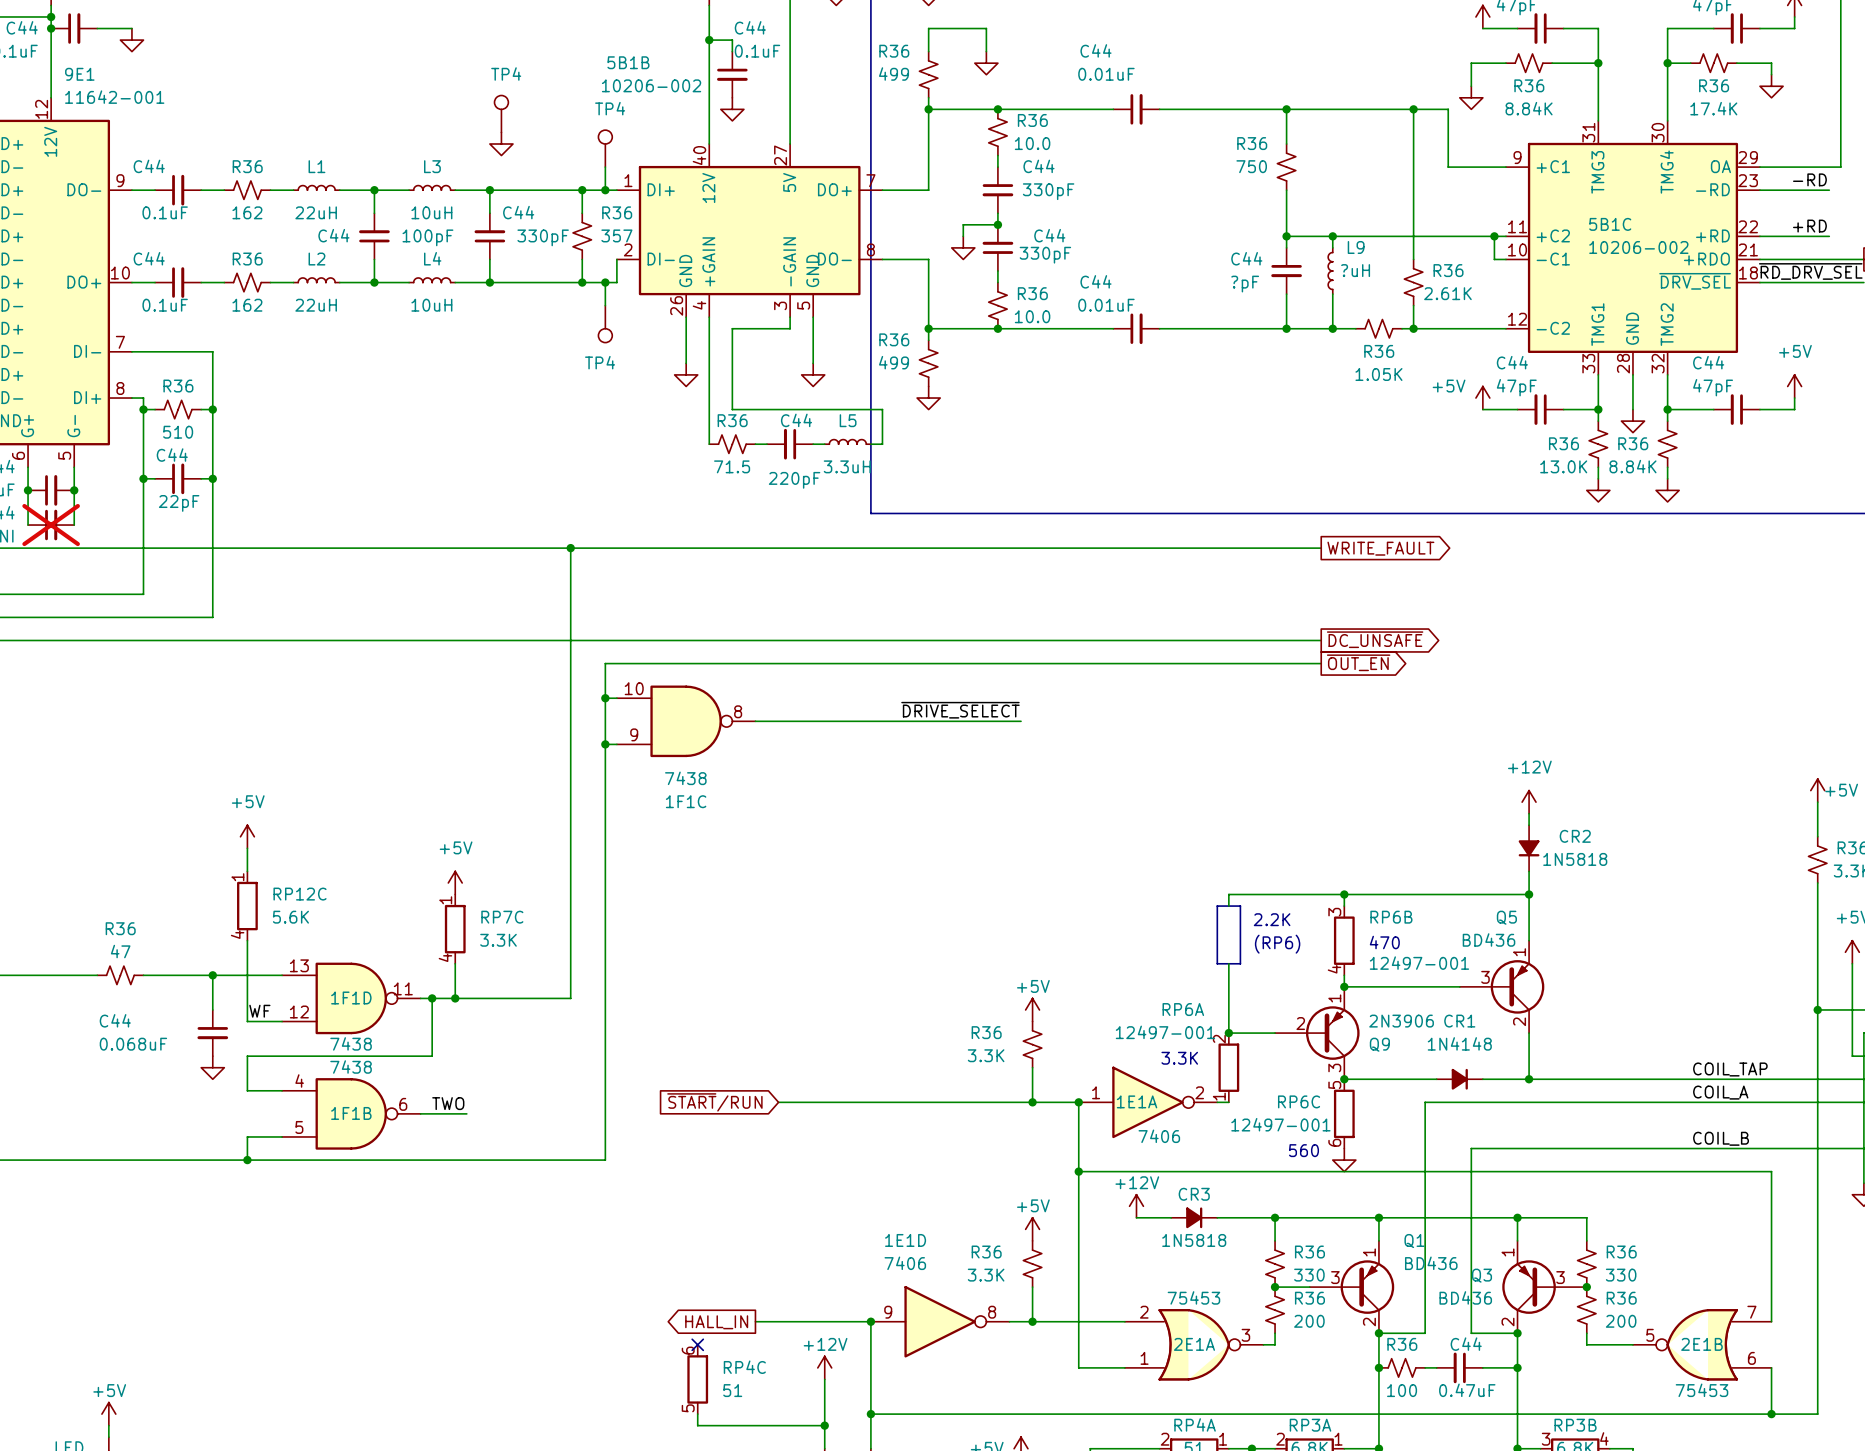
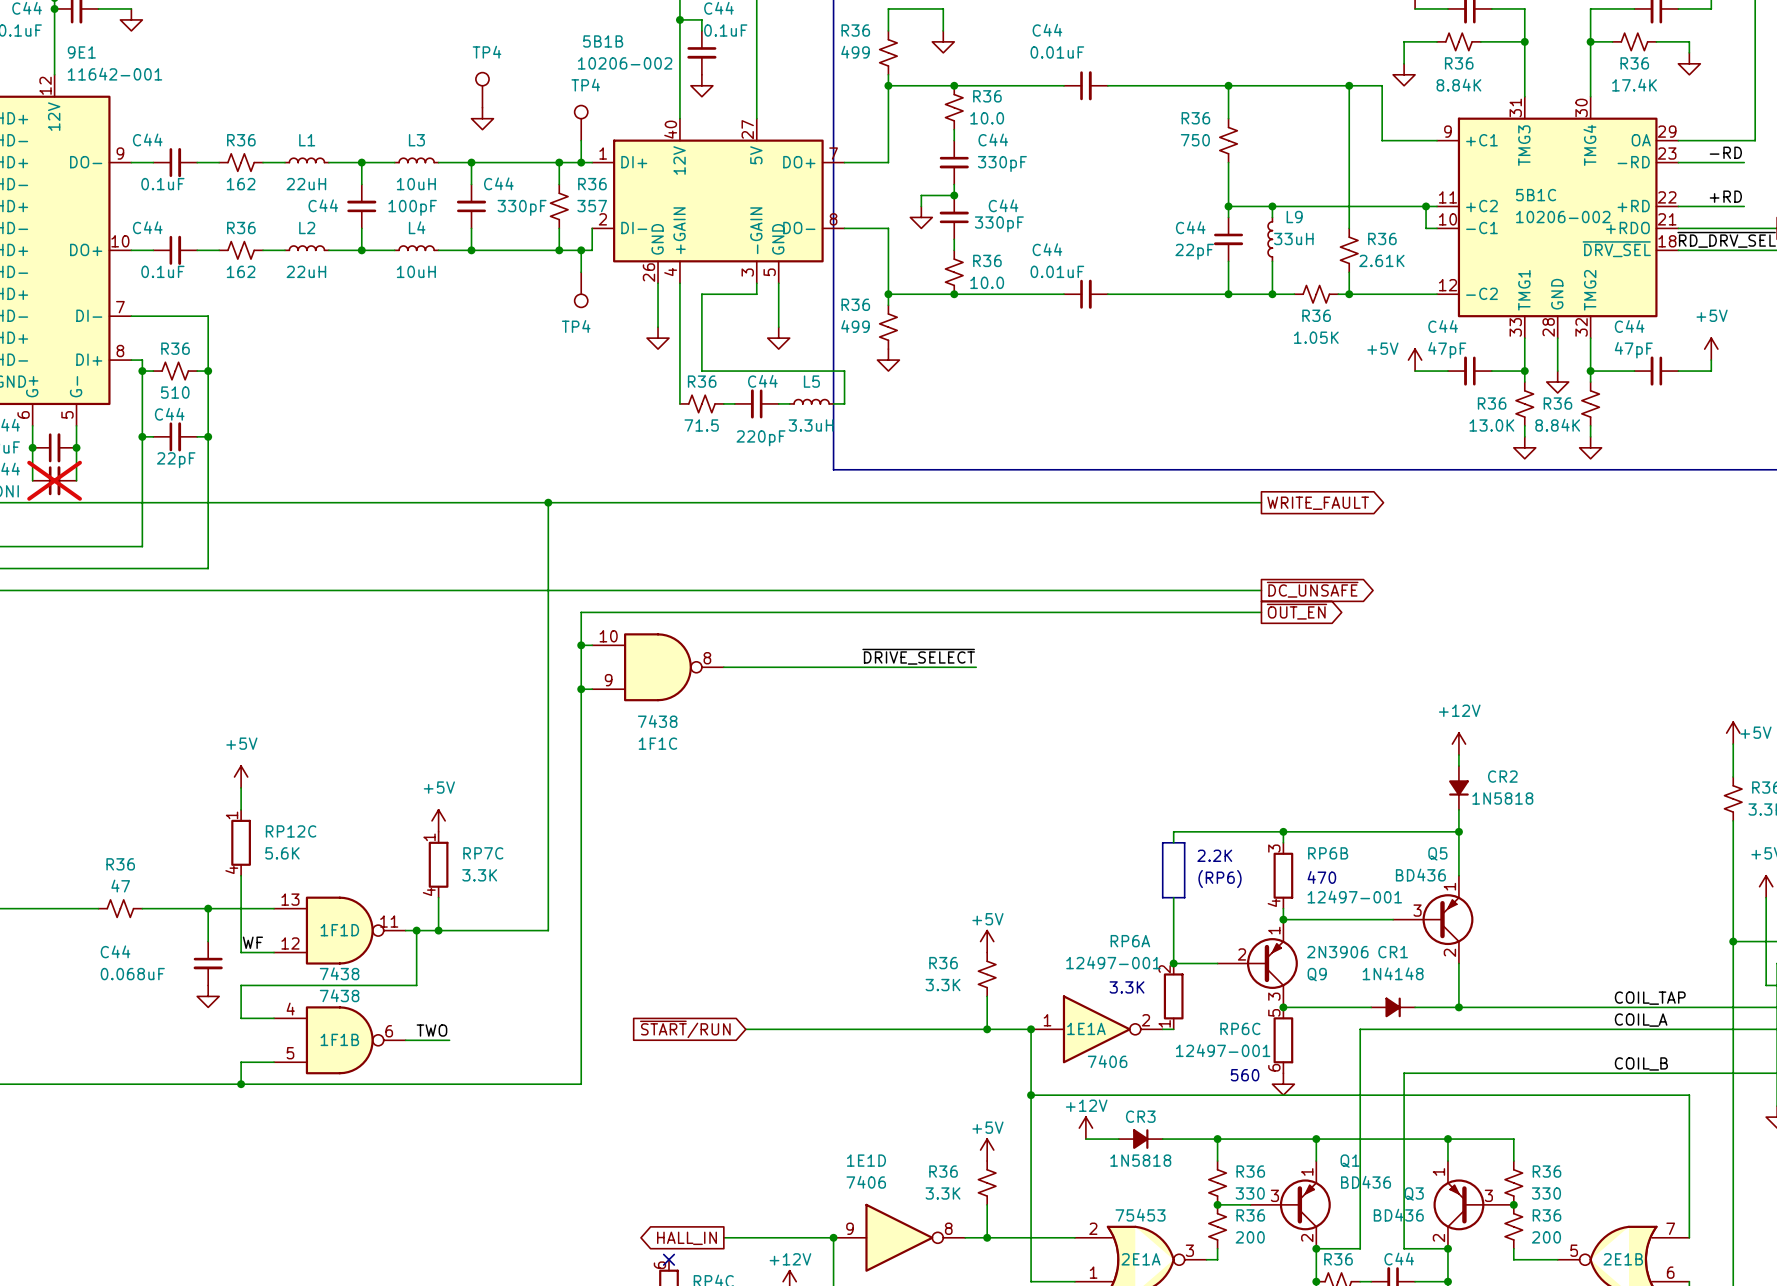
L9 value: ?uH (1355, 270) -> 33uH (1293, 238)
C44 value: ?pF (1245, 284) -> 22pF (1194, 251)

